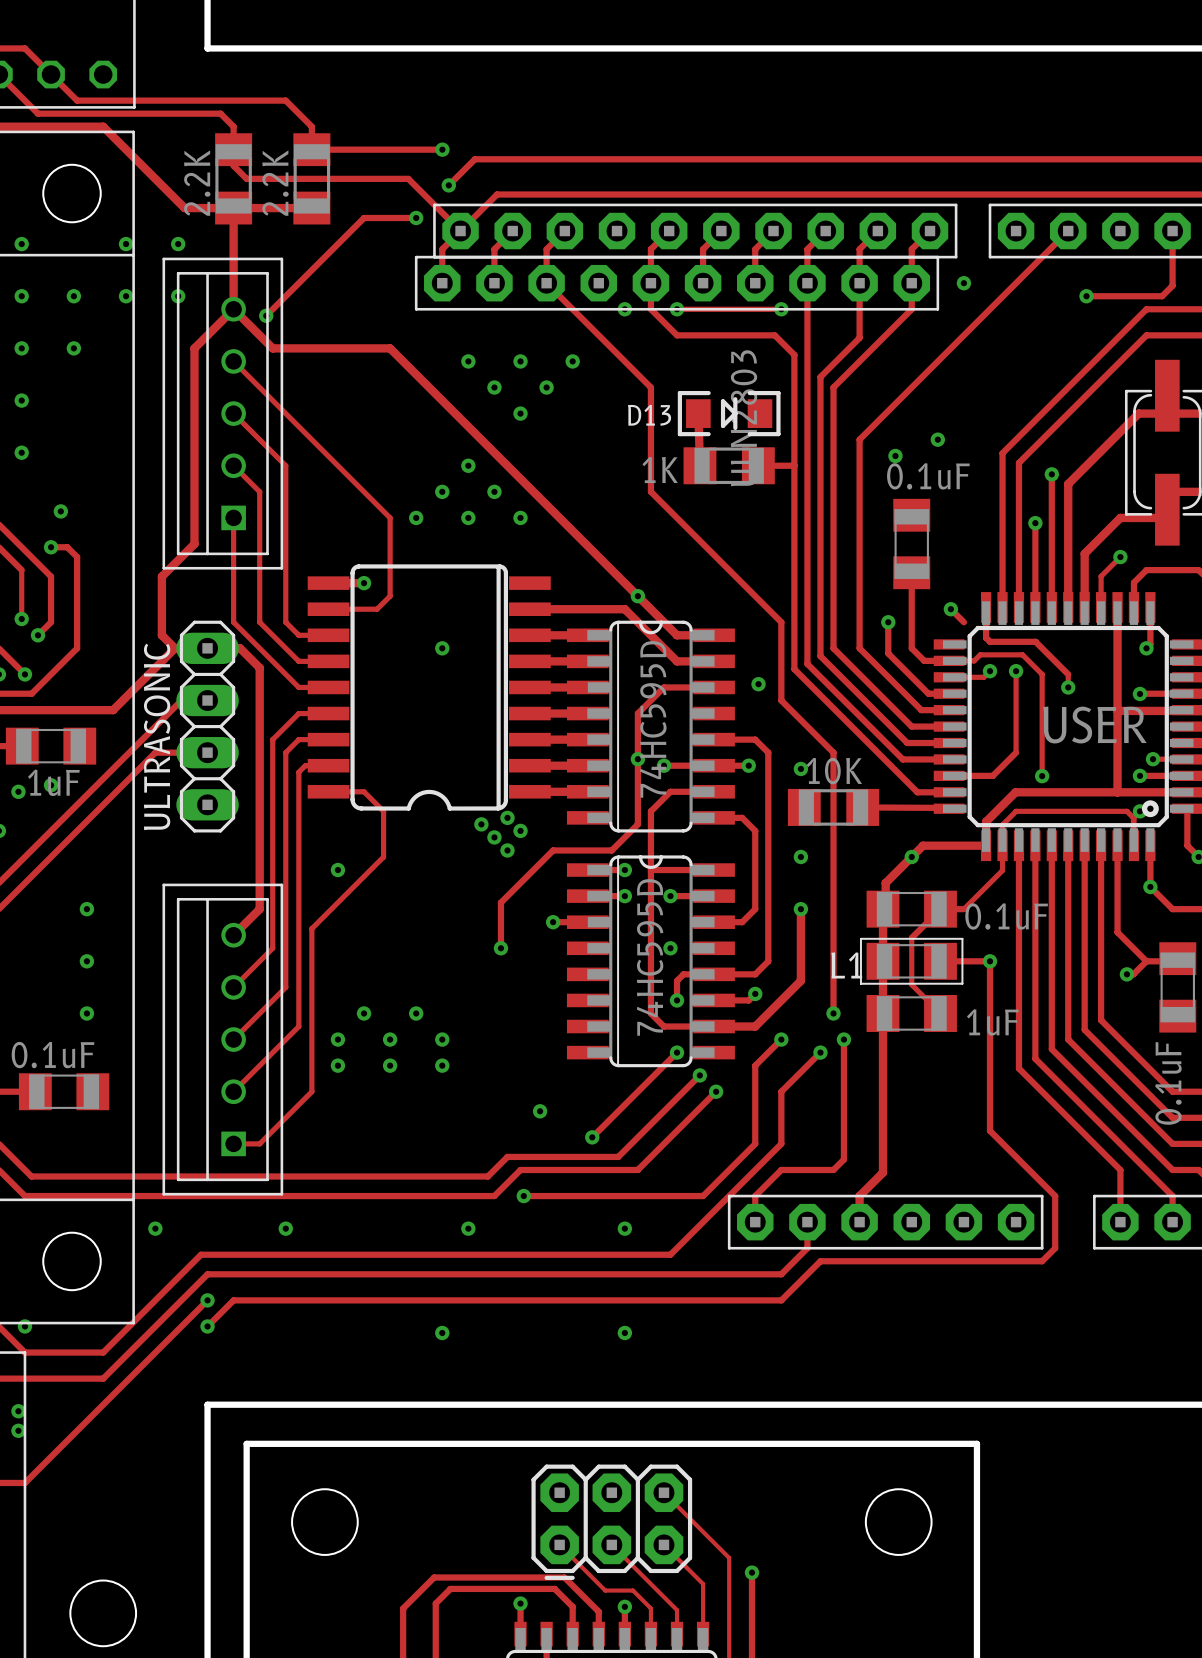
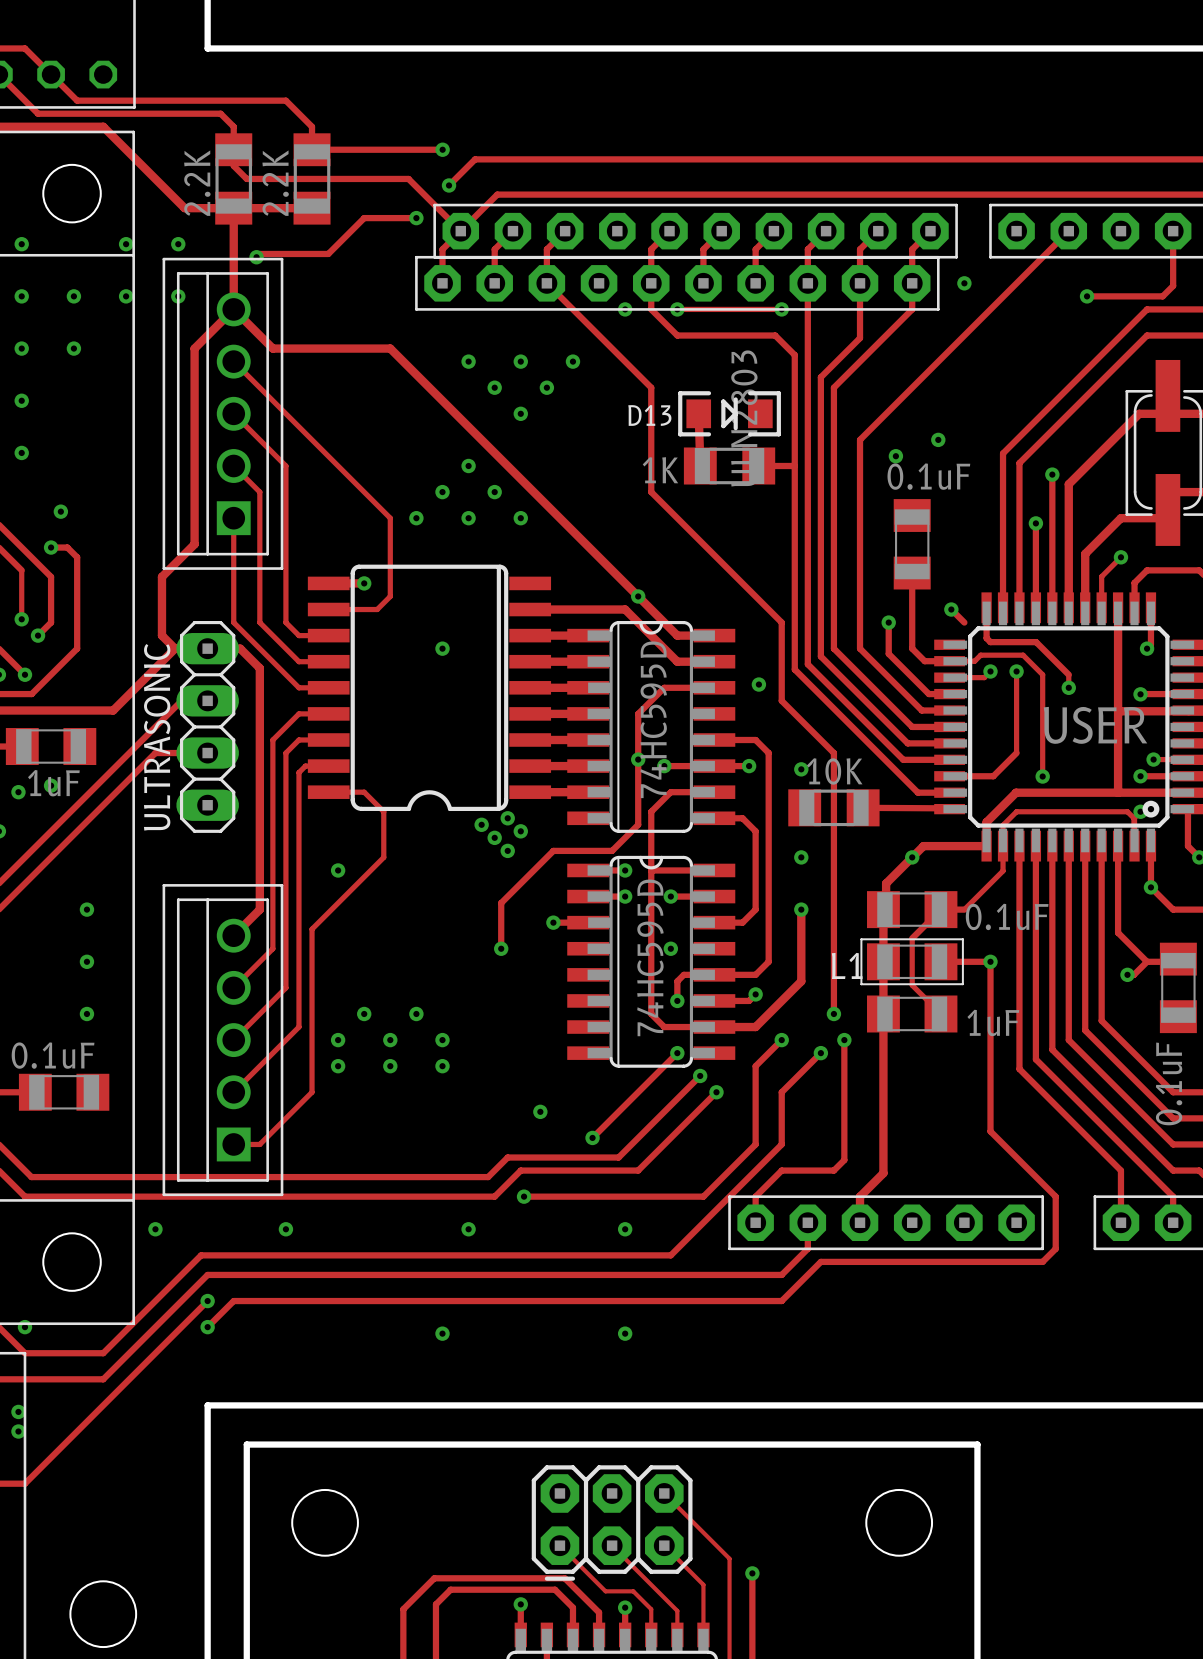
track: (328, 253) (266, 315) -> (328, 253) (259, 253) (256, 257)
part footprint: [162, 257, 284, 570] -> [162, 257, 284, 570]
via position: (266, 315) -> (256, 257)
part footprint: [162, 883, 284, 1196] -> [162, 884, 284, 1197]

